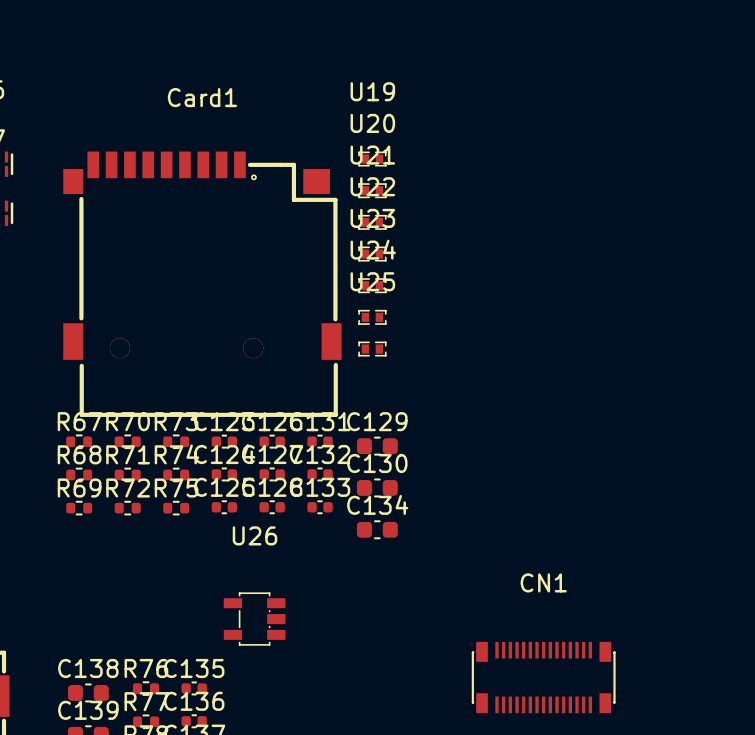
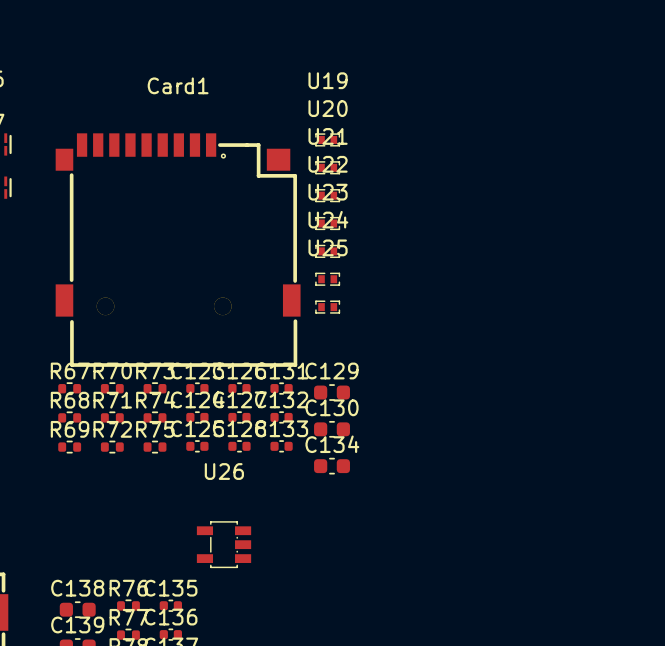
CN1: (543, 677) -> none

